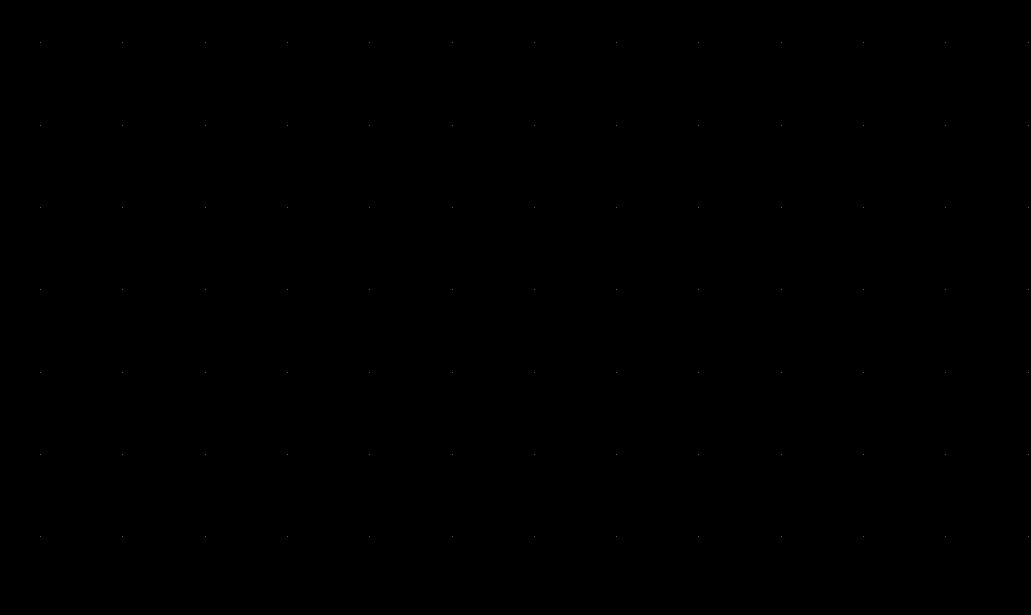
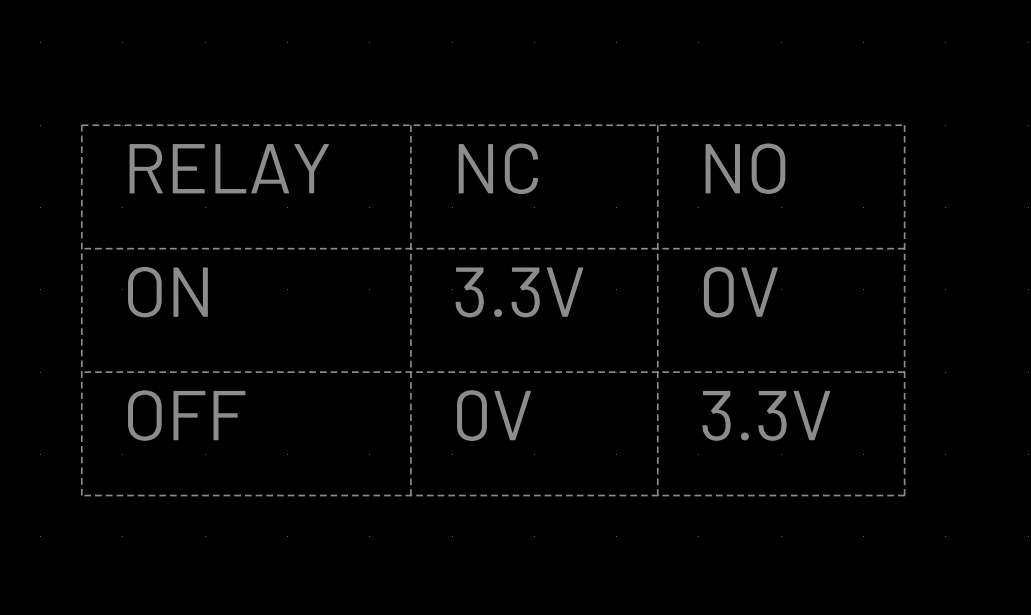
line: none -> (81, 125) (904, 125) (904, 495) (81, 495) (81, 125)
line: none -> (410, 125) (410, 495)
line: none -> (657, 125) (657, 495)
text: none -> RELAY (229, 168)
text: none -> NC (498, 168)
text: none -> NO (745, 168)
line: none -> (81, 248) (904, 248)
text: none -> ON (167, 292)
text: none -> 3.3V (519, 292)
text: none -> 0V (740, 292)
line: none -> (81, 372) (904, 372)
text: none -> OFF (186, 415)
text: none -> 0V (494, 415)
text: none -> 3.3V (766, 415)

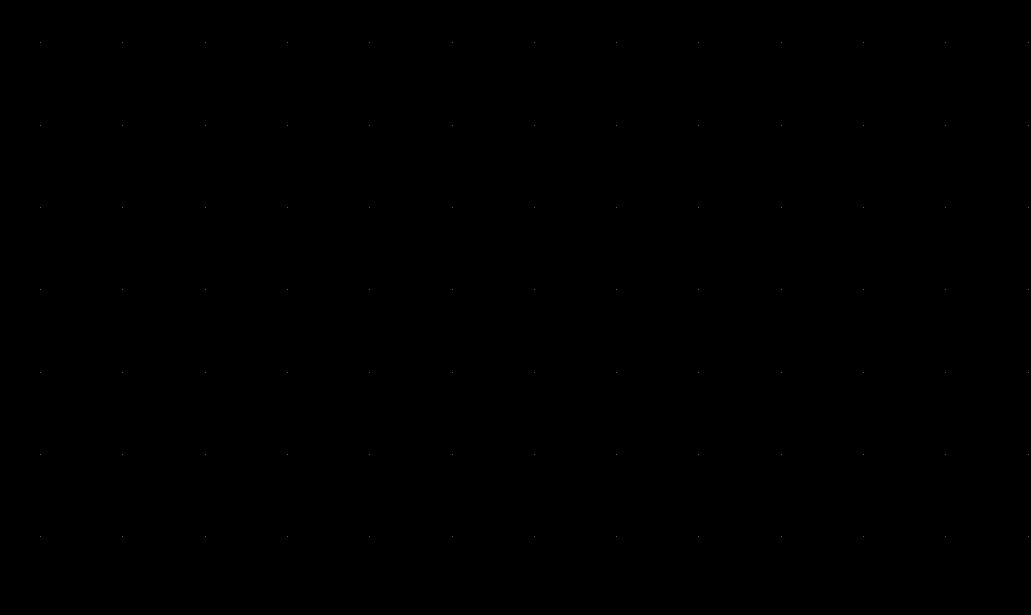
line: (81, 125) (904, 125) (904, 495) (81, 495) (81, 125) -> none
line: (410, 125) (410, 495) -> none
line: (657, 125) (657, 495) -> none
text: RELAY (229, 168) -> none
text: NC (498, 168) -> none
text: NO (745, 168) -> none
line: (81, 248) (904, 248) -> none
text: ON (167, 292) -> none
text: 3.3V (519, 292) -> none
text: 0V (740, 292) -> none
line: (81, 372) (904, 372) -> none
text: OFF (186, 415) -> none
text: 0V (494, 415) -> none
text: 3.3V (766, 415) -> none

